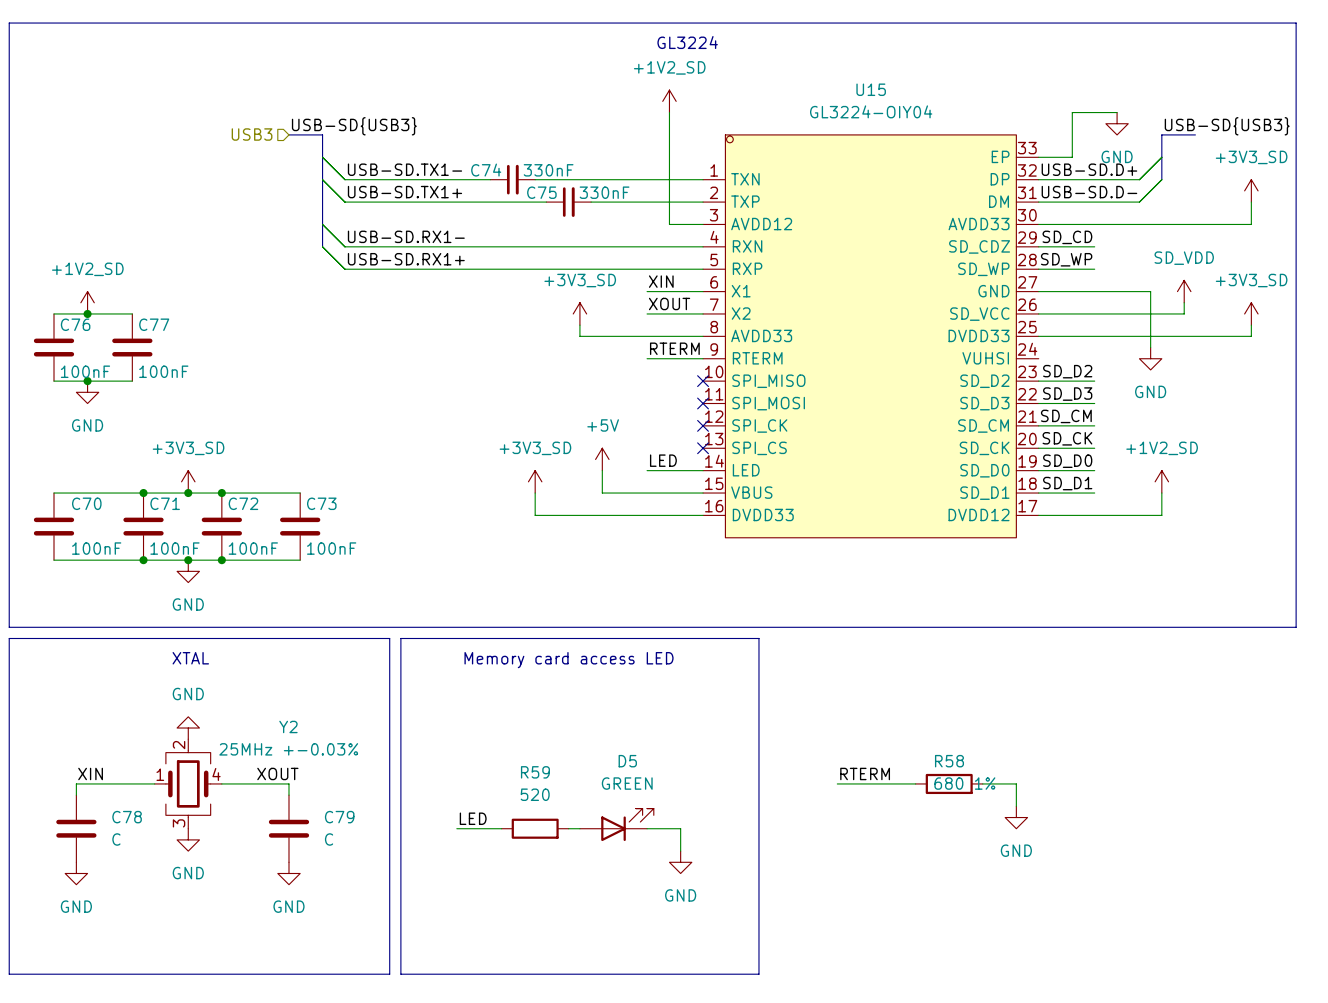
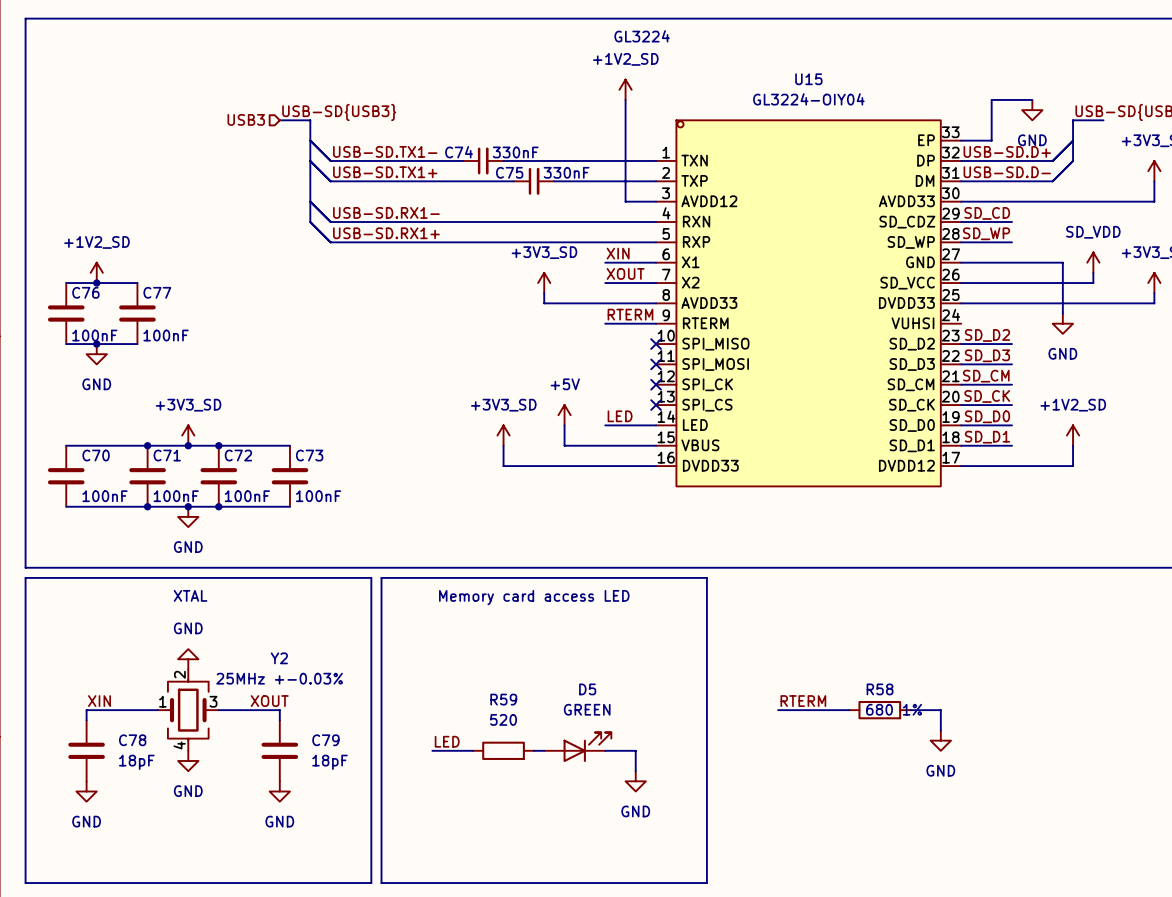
Y2 pin number: 4 (216, 774) -> 3 (213, 701)
Y2 pin number: 3 (179, 823) -> 4 (179, 745)
C78 value: C (116, 839) -> 18pF (136, 762)
C79 value: C (329, 839) -> 18pF (330, 762)

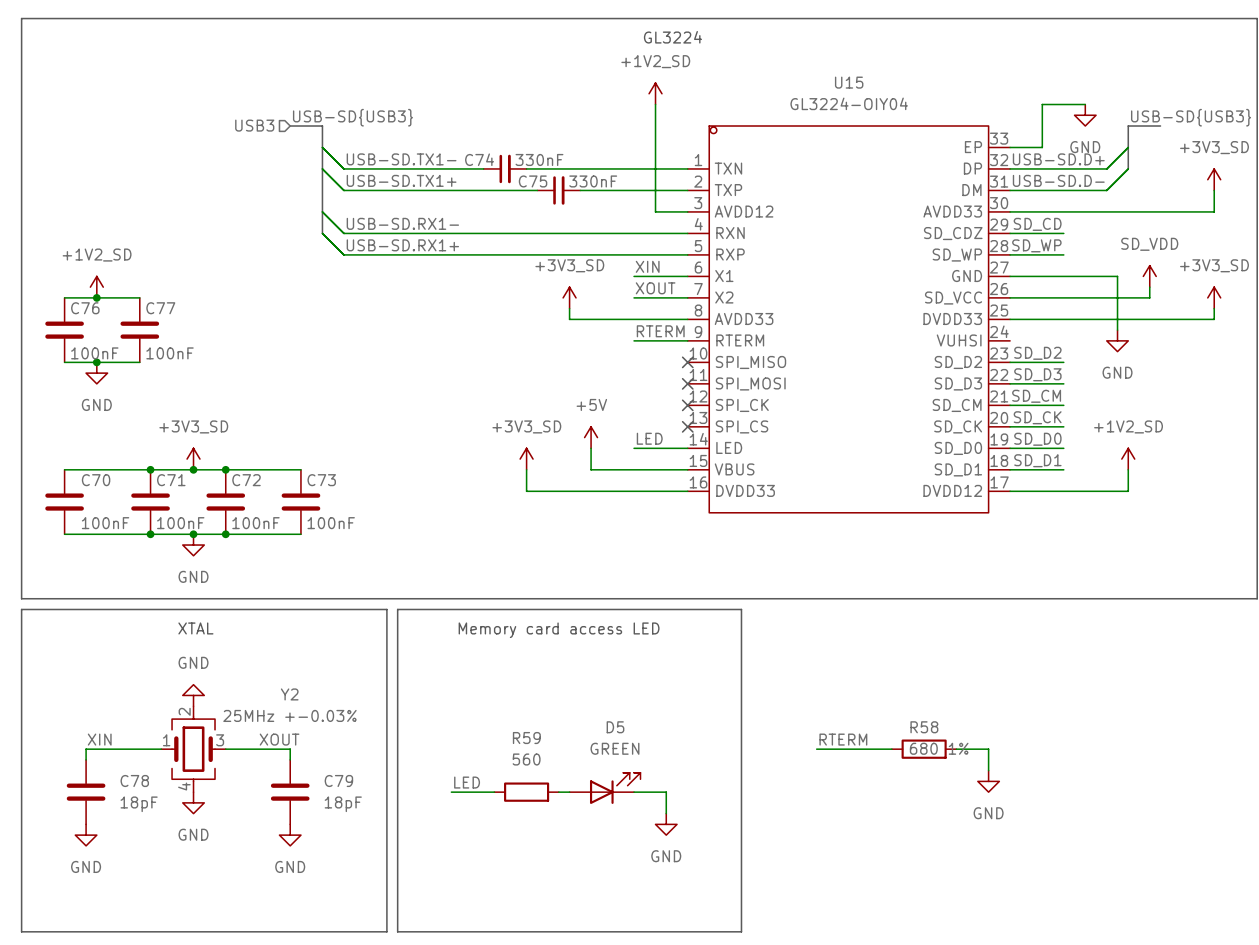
R59 value: 520 (503, 719) -> 560 (526, 759)

